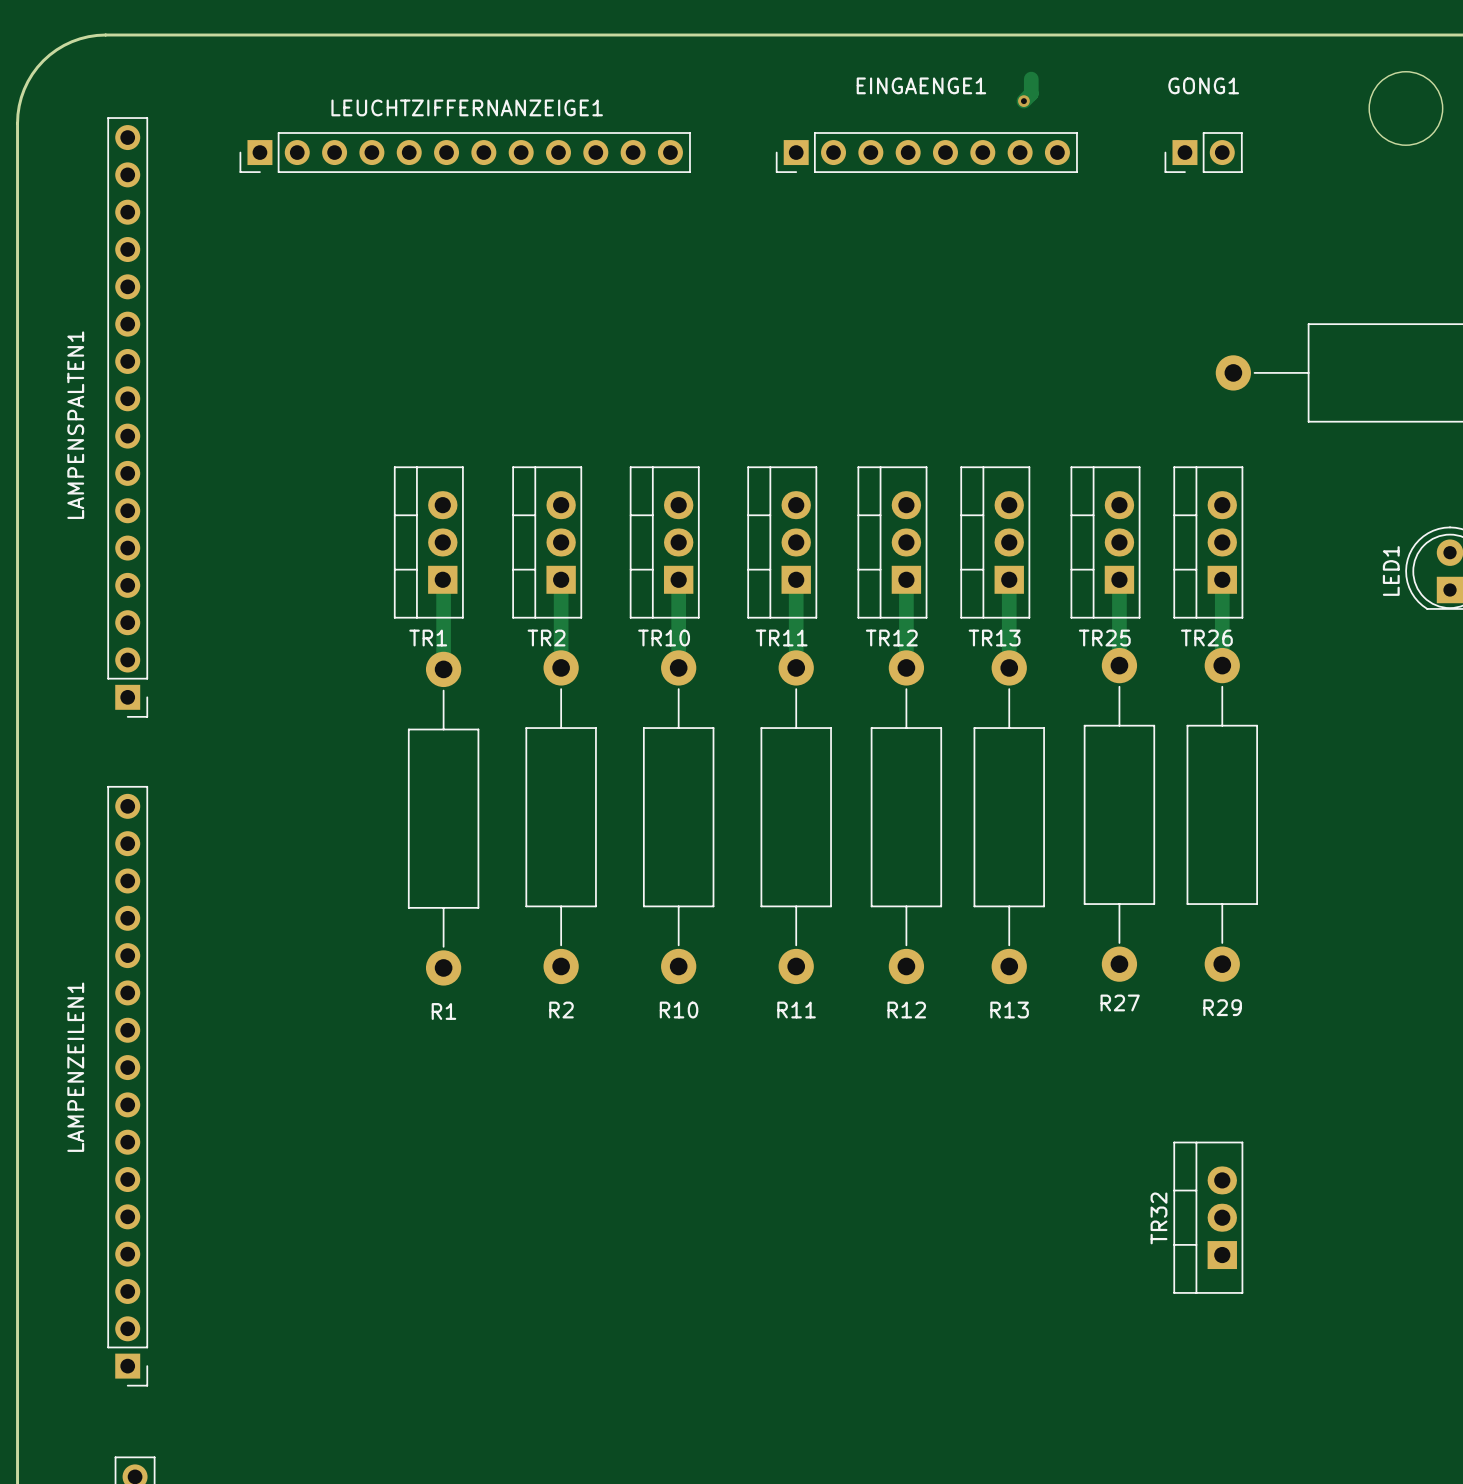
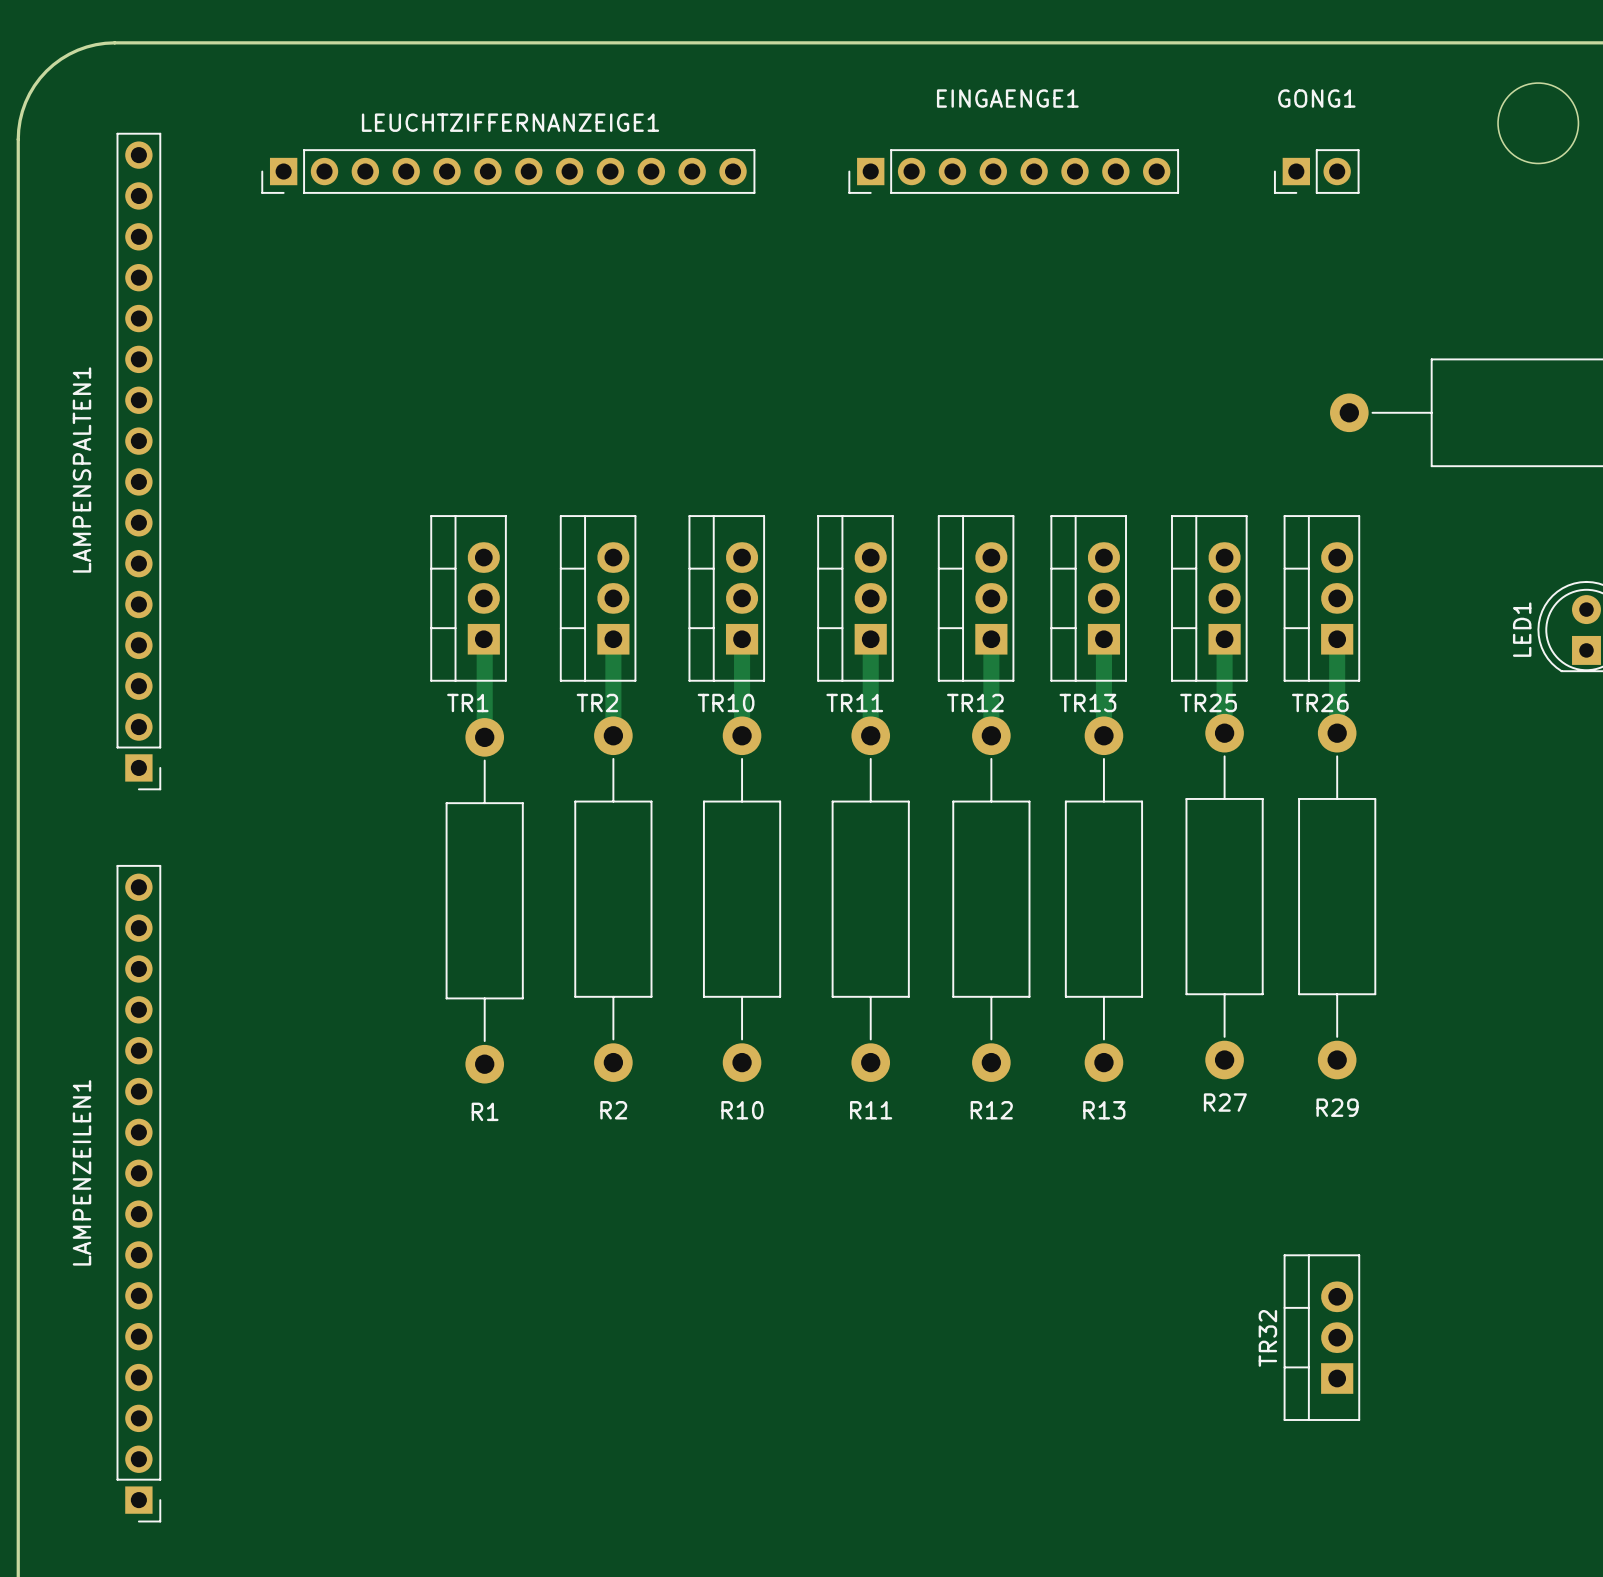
track: (1031, 79) (1031, 93) (1023, 101) -> none
via: (1023, 101) -> none

